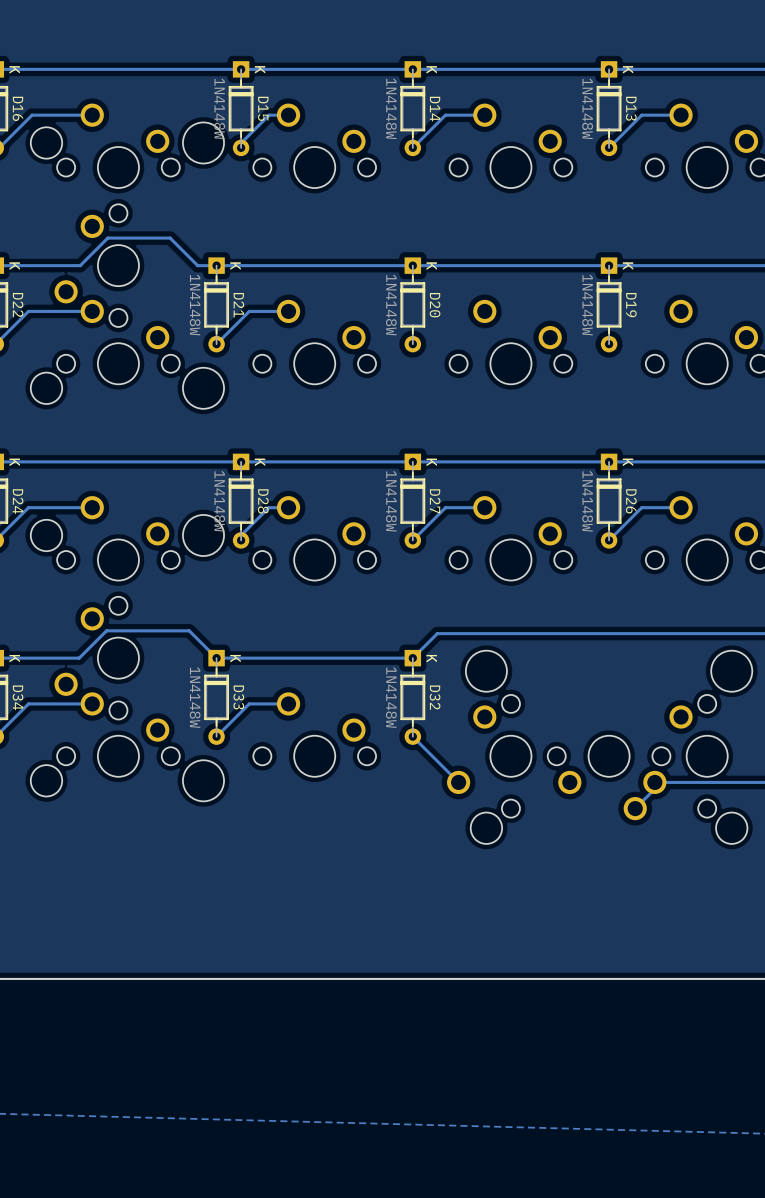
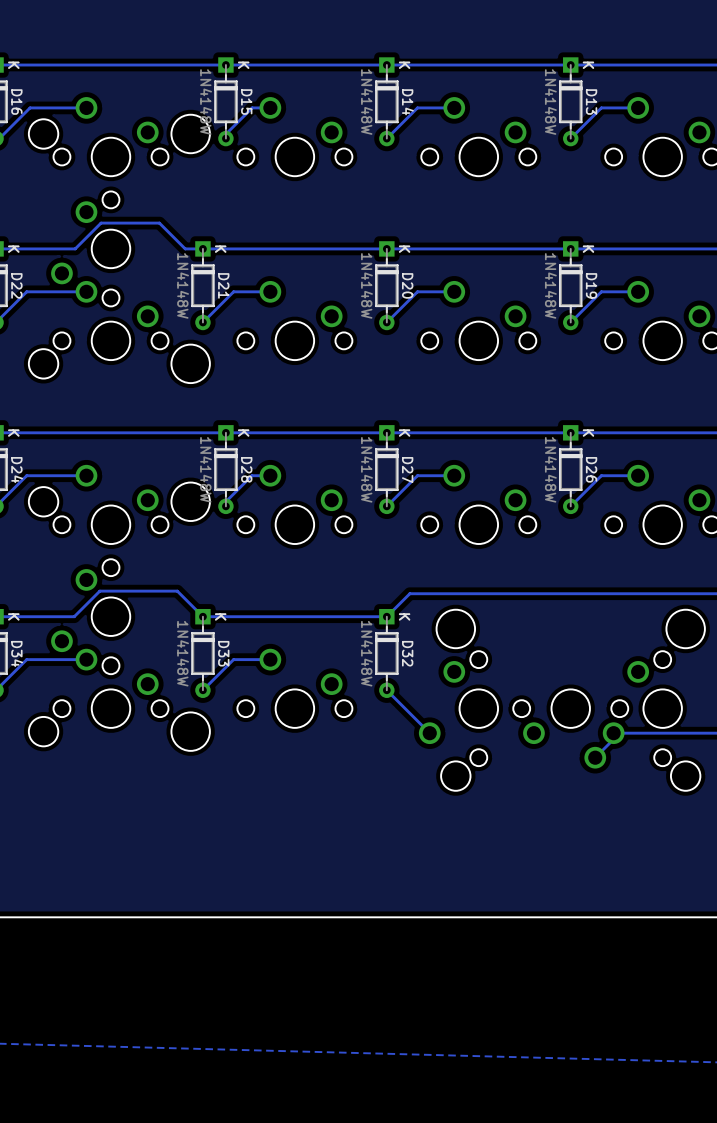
track: none -> (454, 291) (417, 291) (386, 322)
track: none -> (638, 291) (601, 291) (570, 322)

